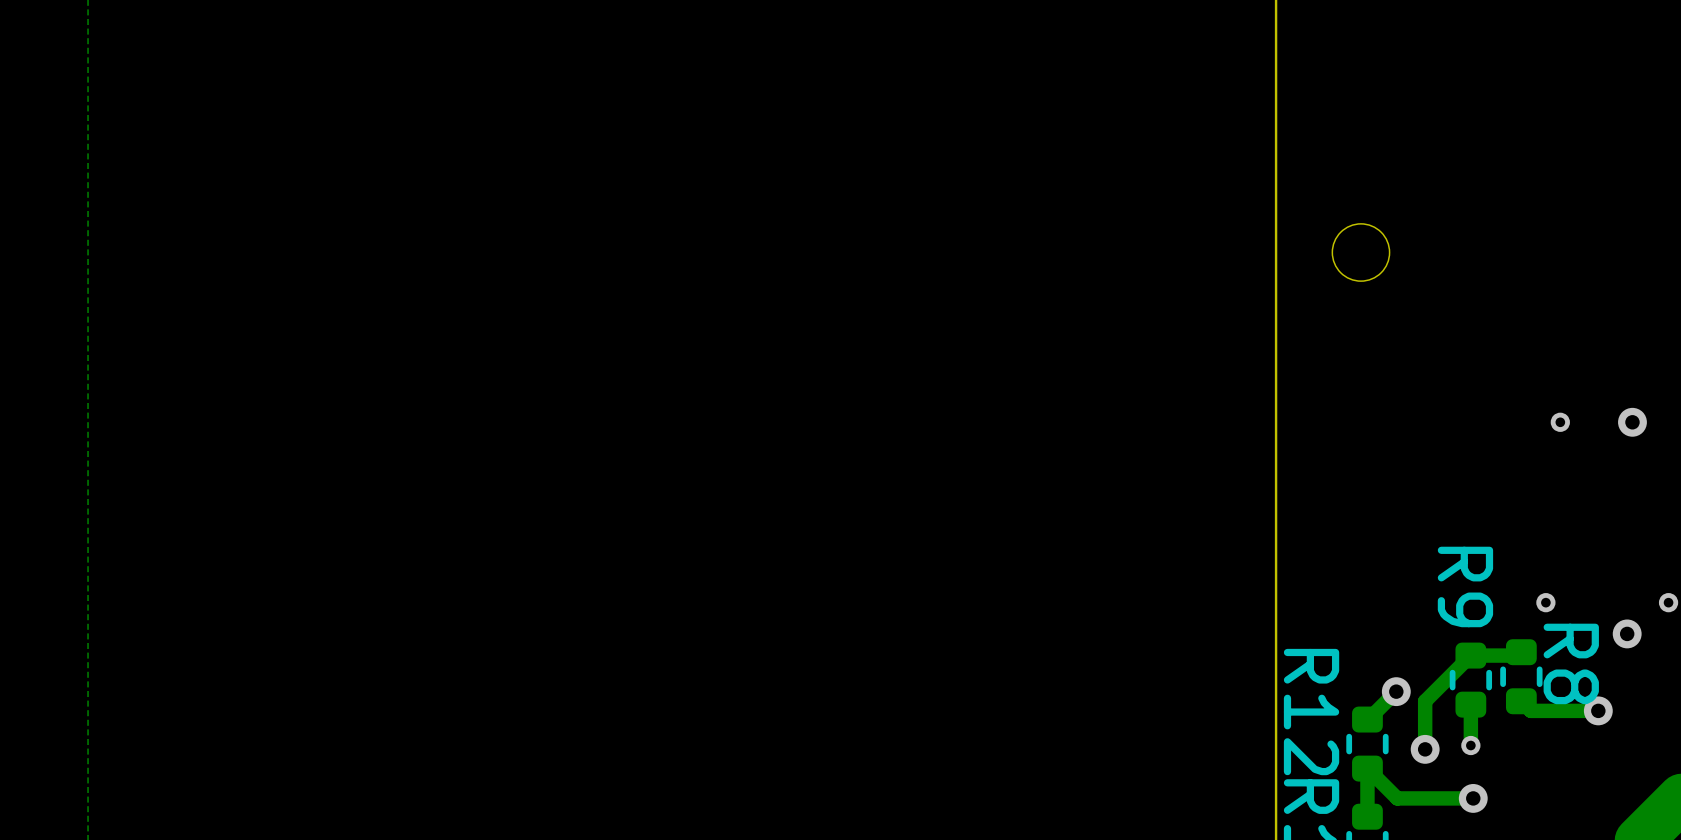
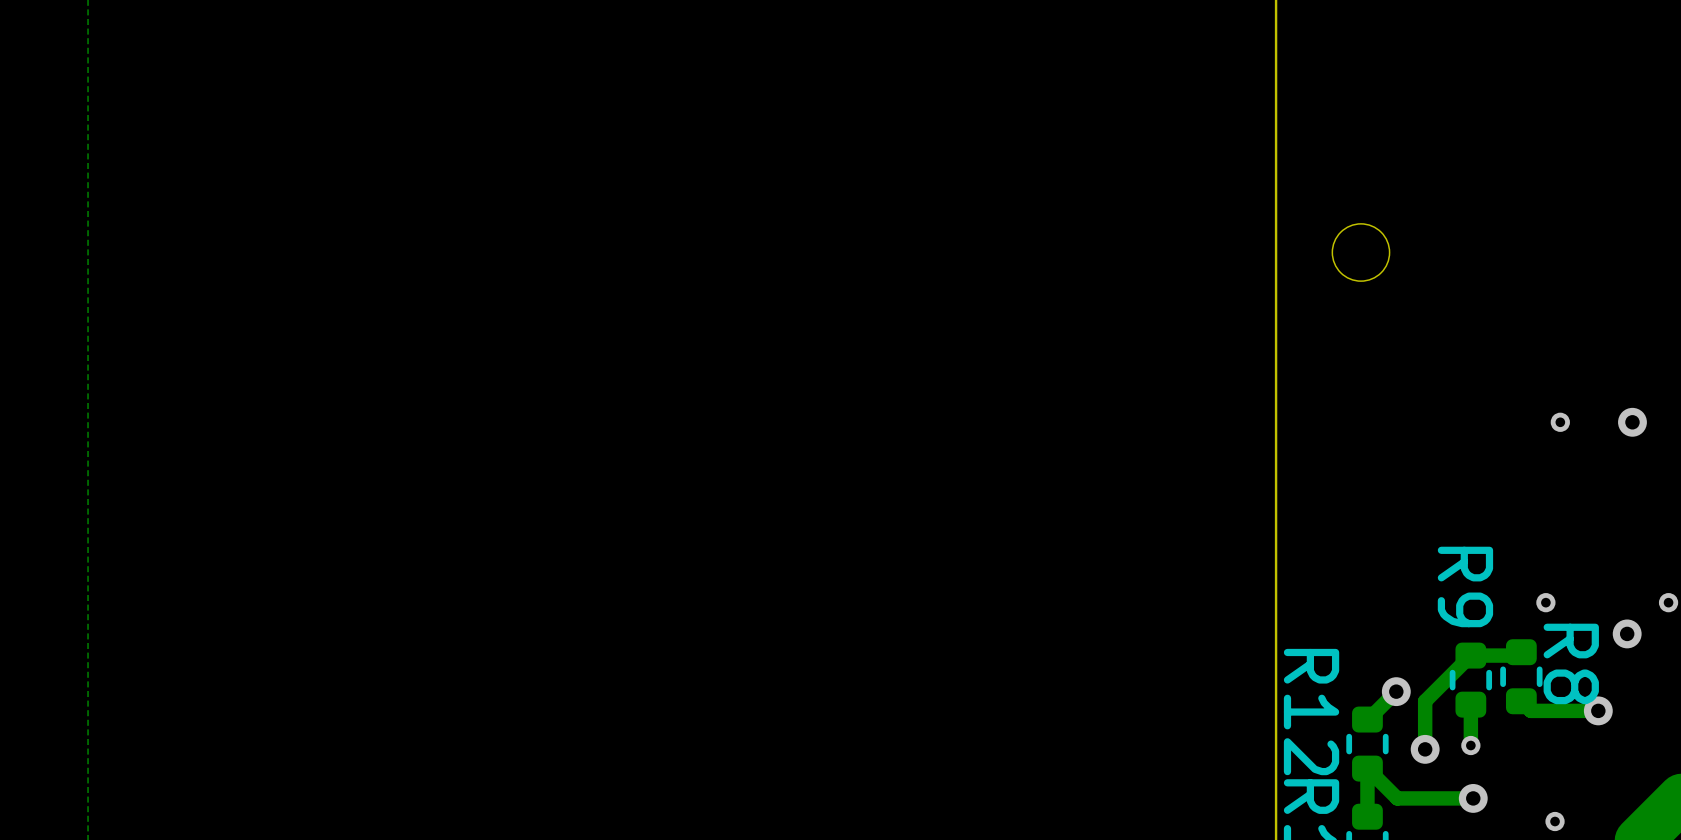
via: none -> (1555, 821)

